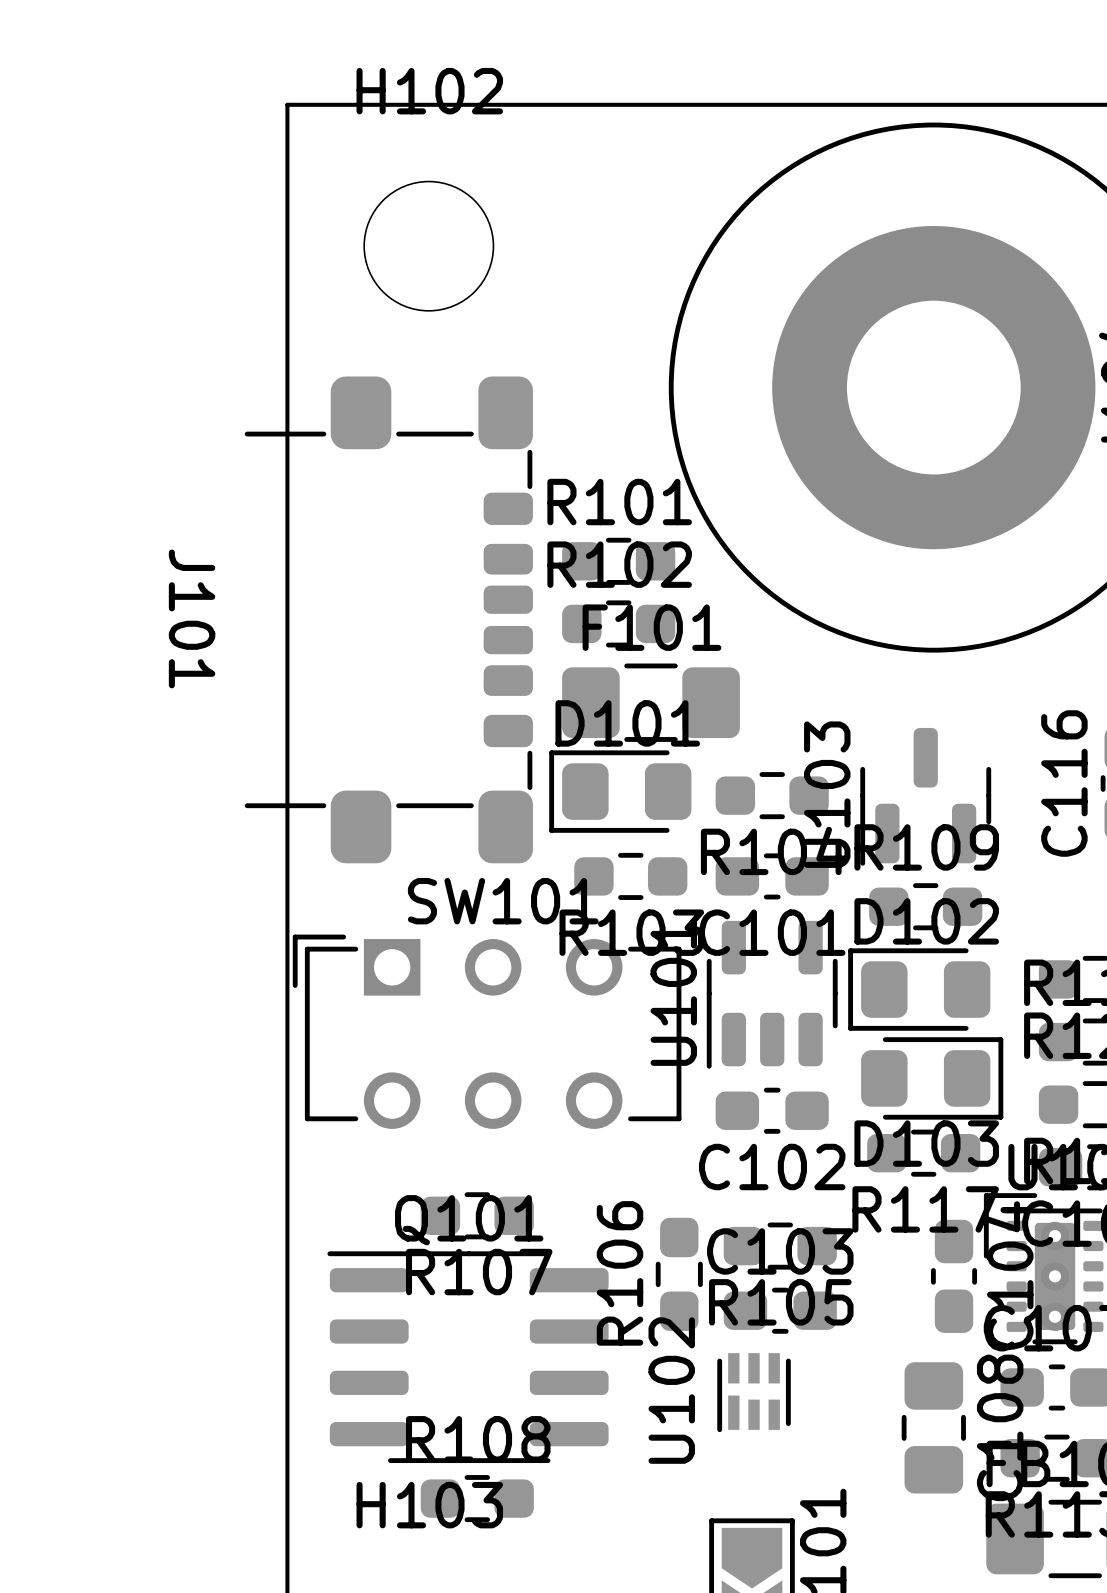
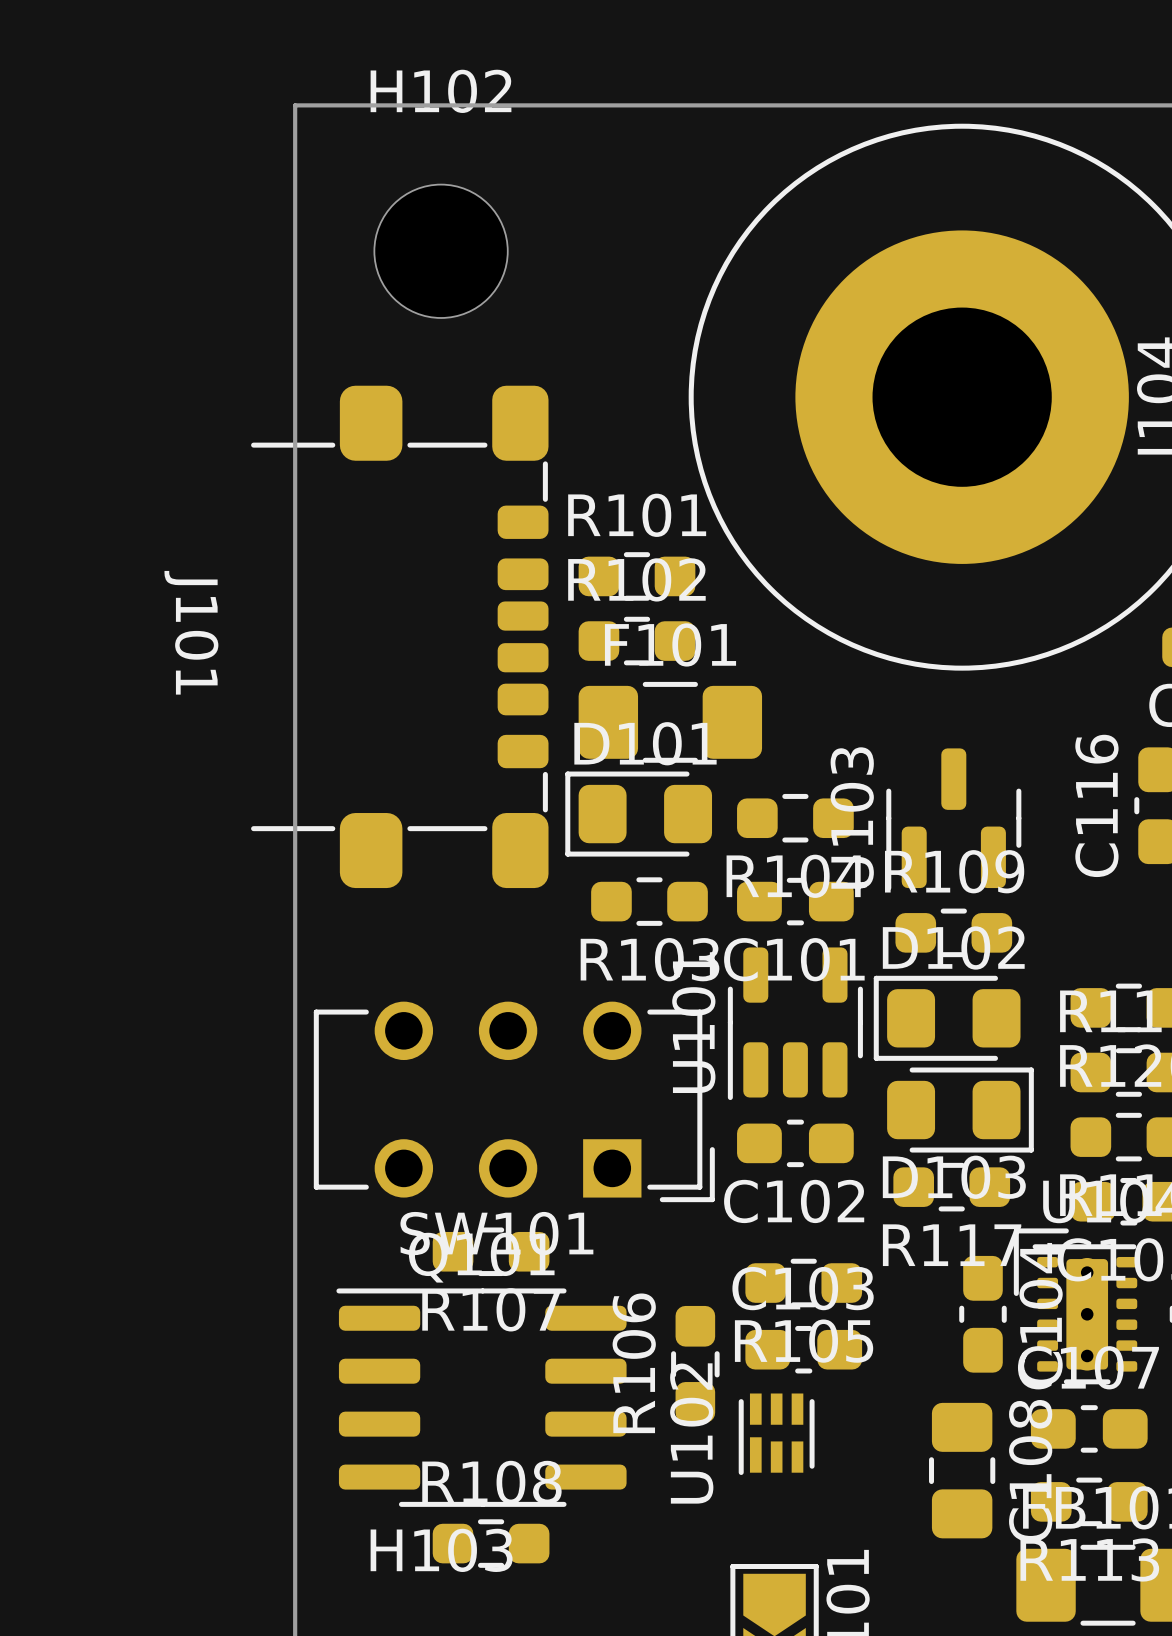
SW101 rotation: 0° (487, 1031) -> 180° (514, 1101)
R106 position: (679, 1274) -> (695, 1364)

